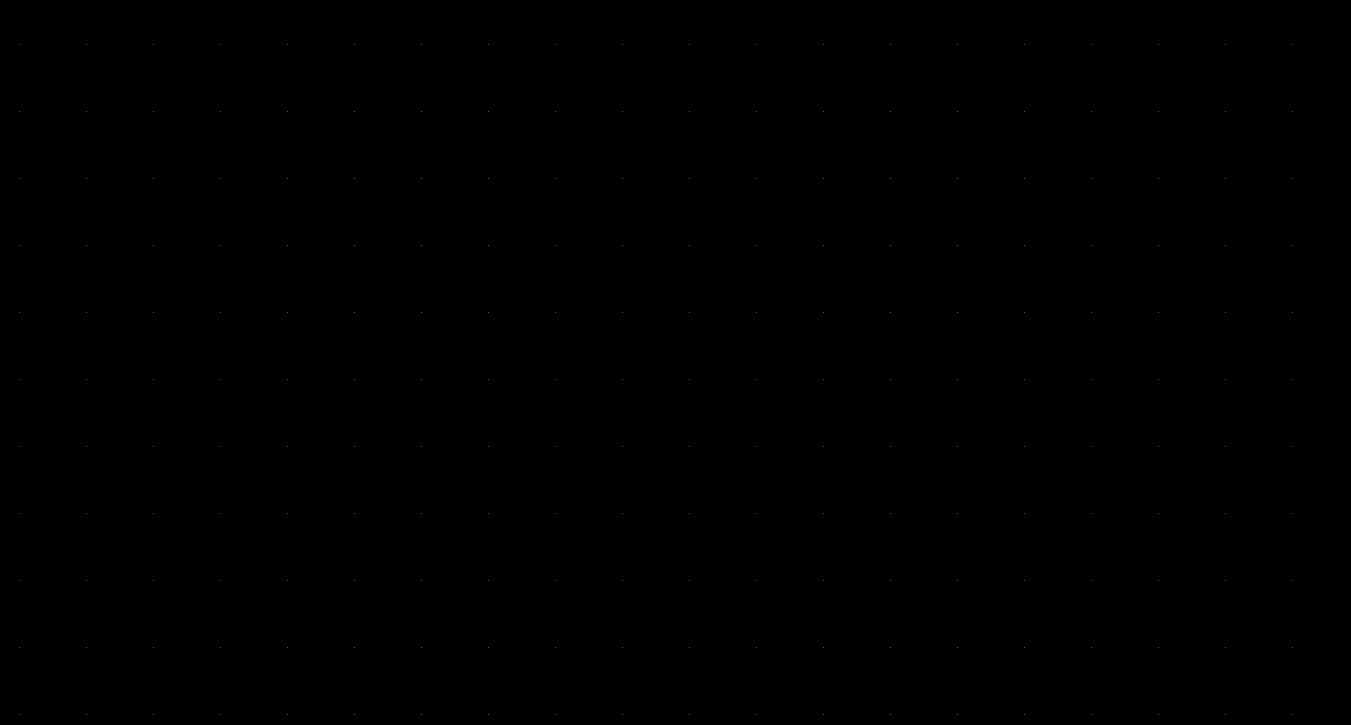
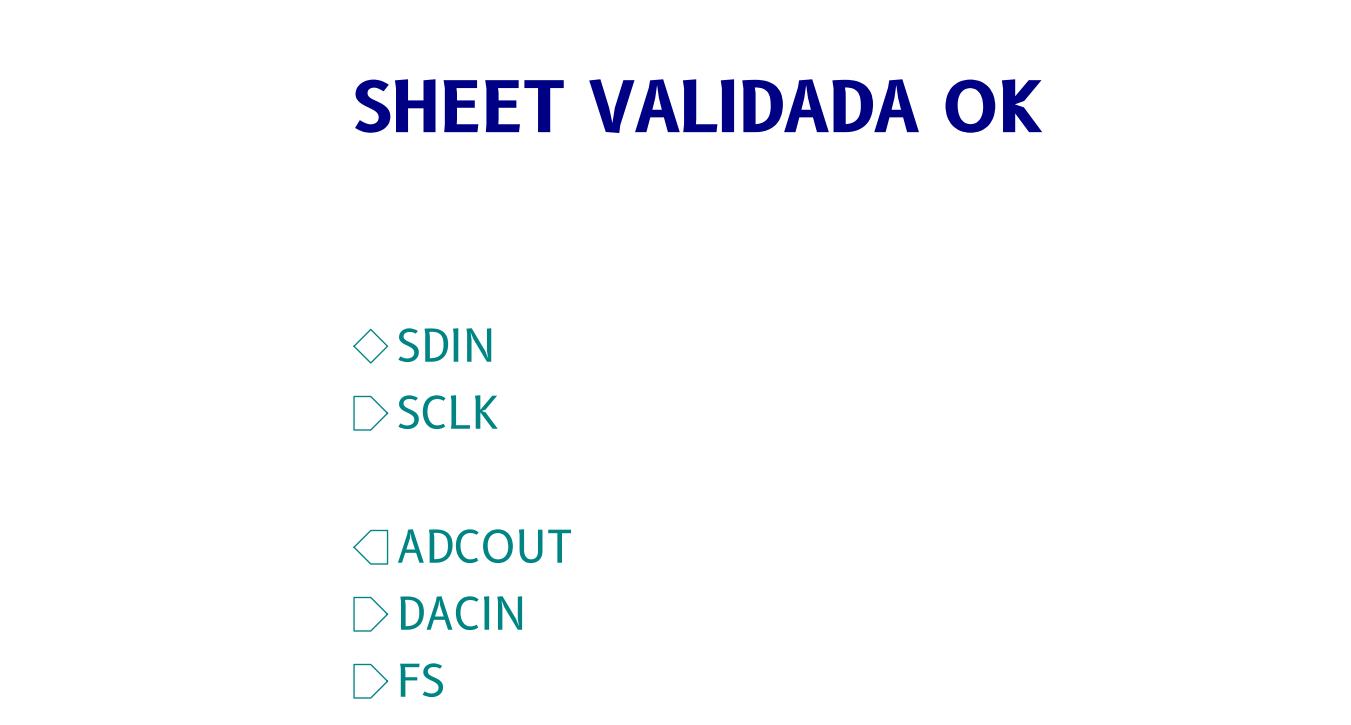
text: none -> SHEET VALIDADA OK (698, 106)
sheet pin: none -> SDIN (444, 345)
sheet pin: none -> SCLK (448, 412)
sheet pin: none -> ADCOUT (484, 546)
sheet pin: none -> DACIN (461, 613)
sheet pin: none -> FS (421, 680)

